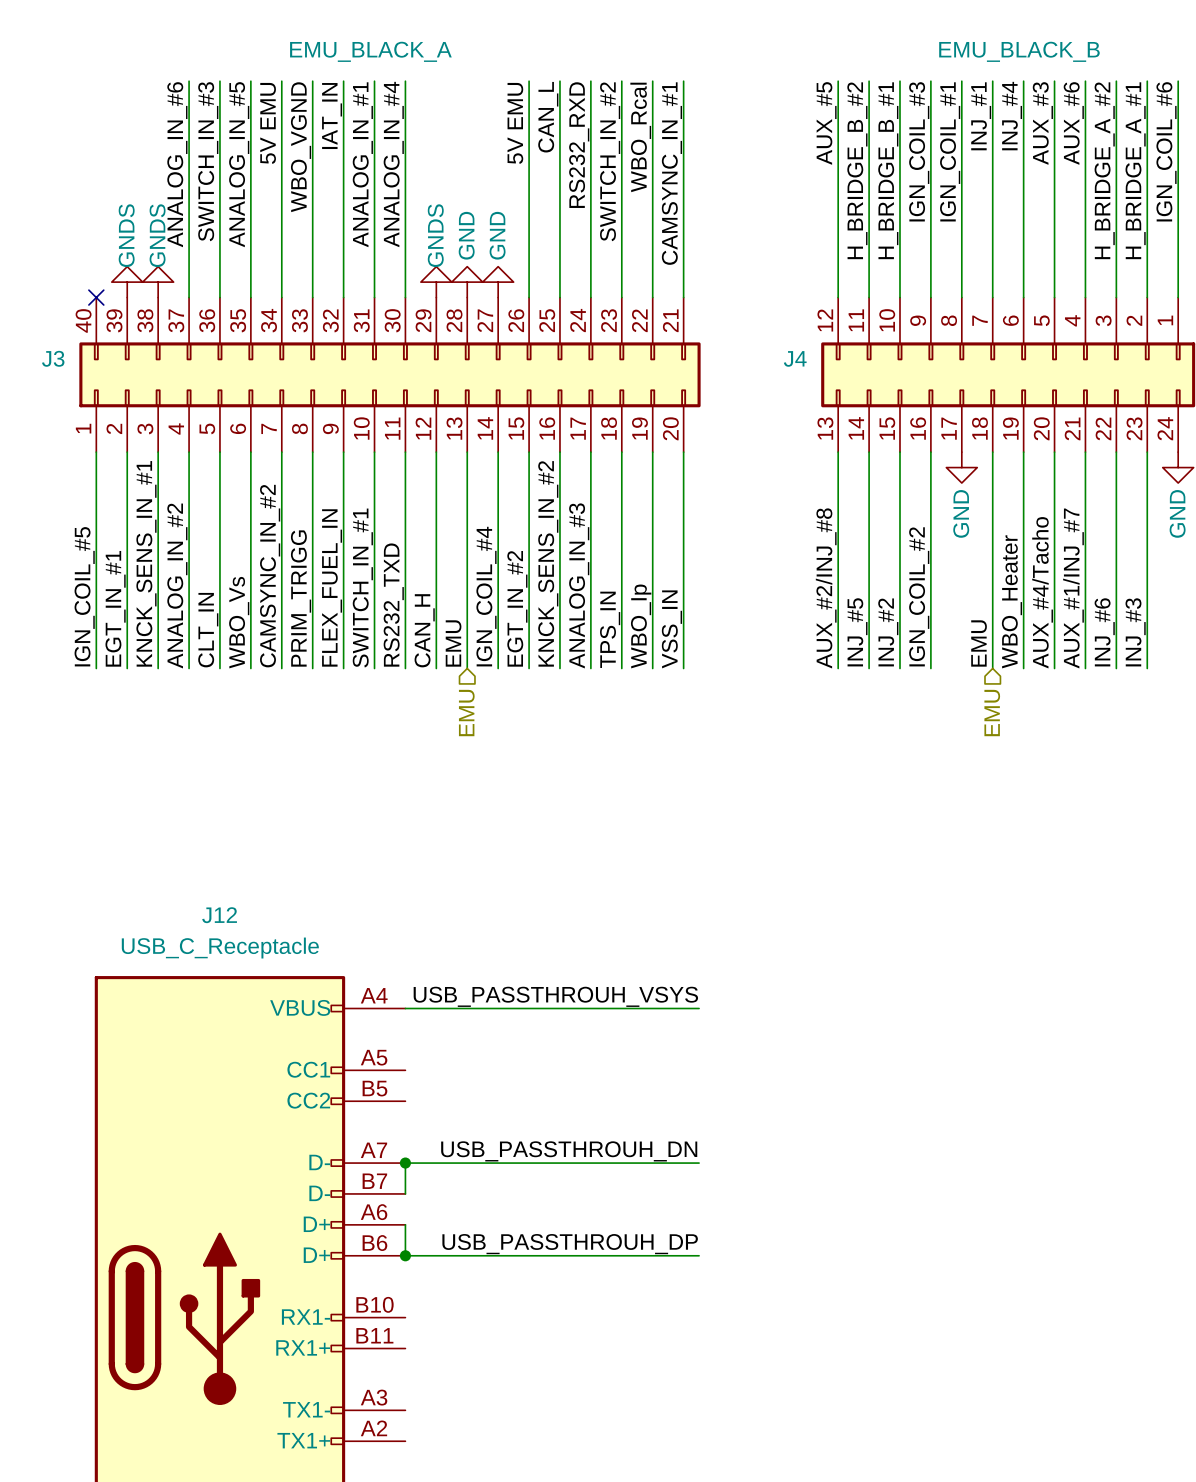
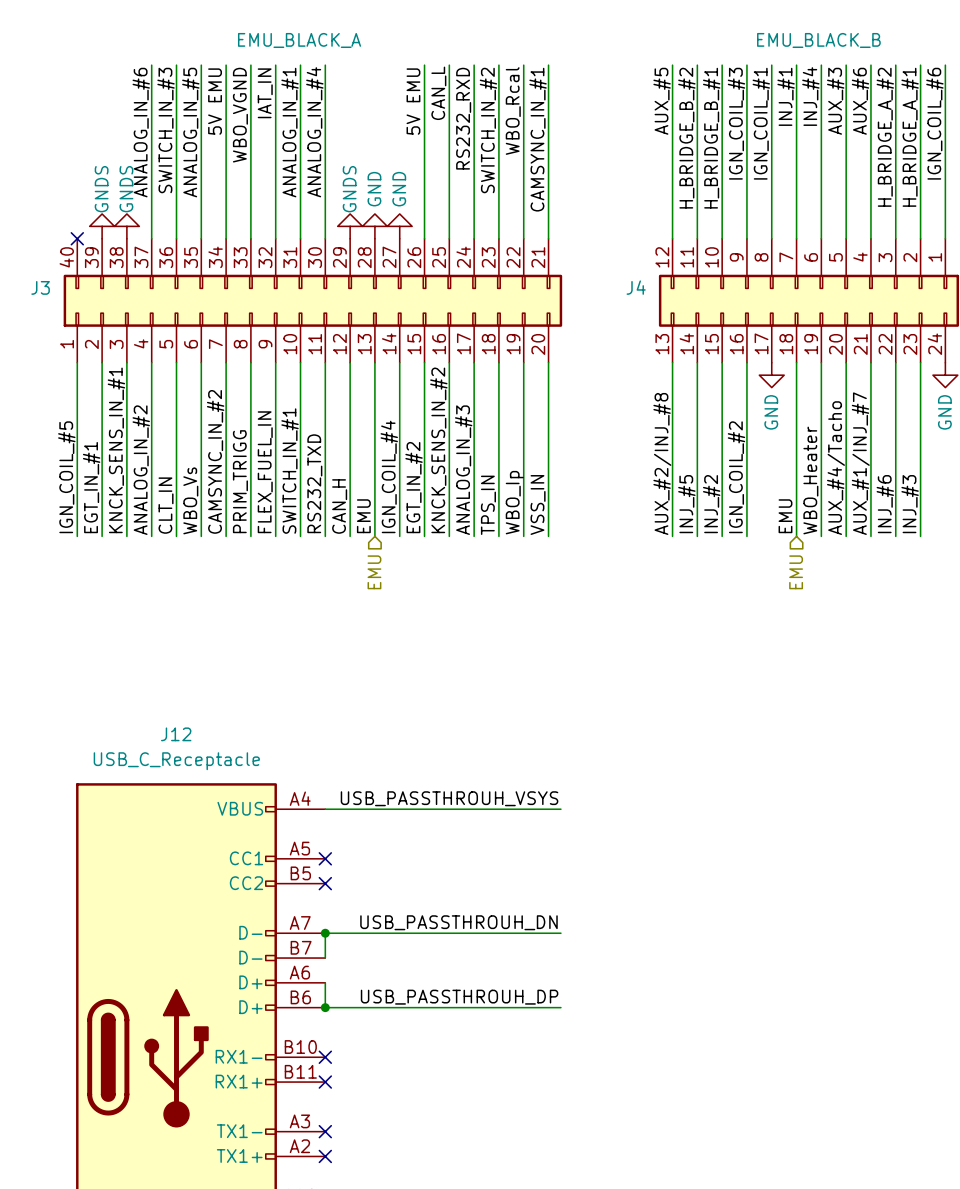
no-connect mark: none -> (325, 858)
no-connect mark: none -> (325, 883)
no-connect mark: none -> (325, 1057)
no-connect mark: none -> (325, 1082)
no-connect mark: none -> (325, 1131)
no-connect mark: none -> (325, 1156)

